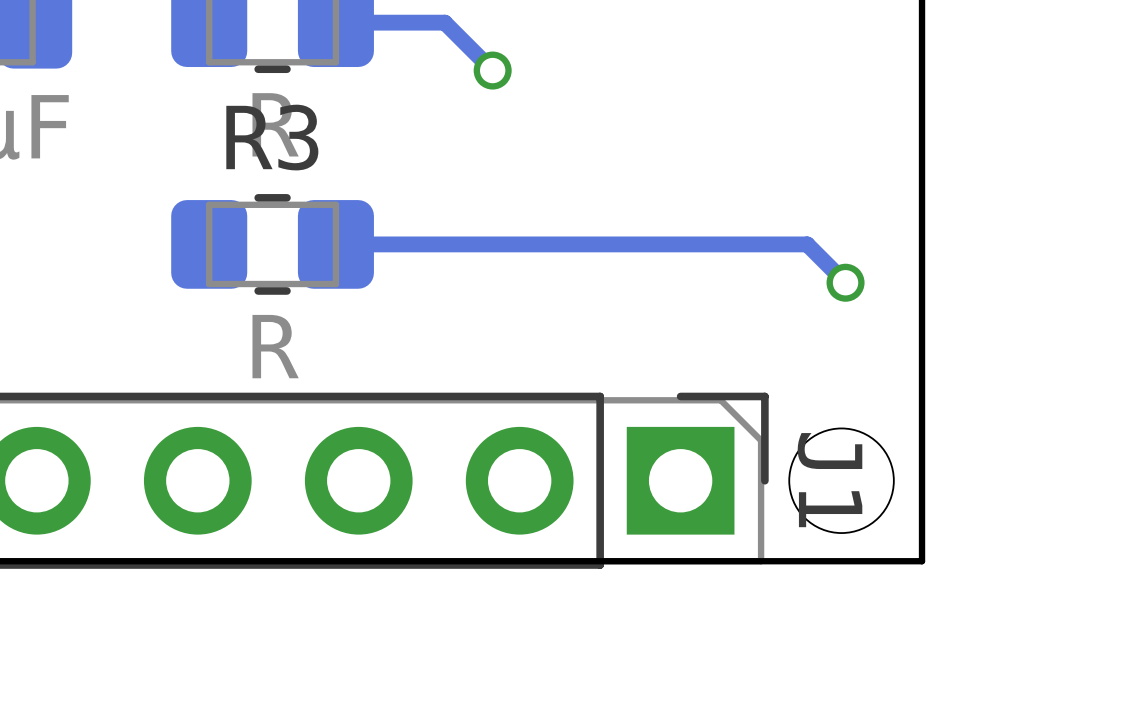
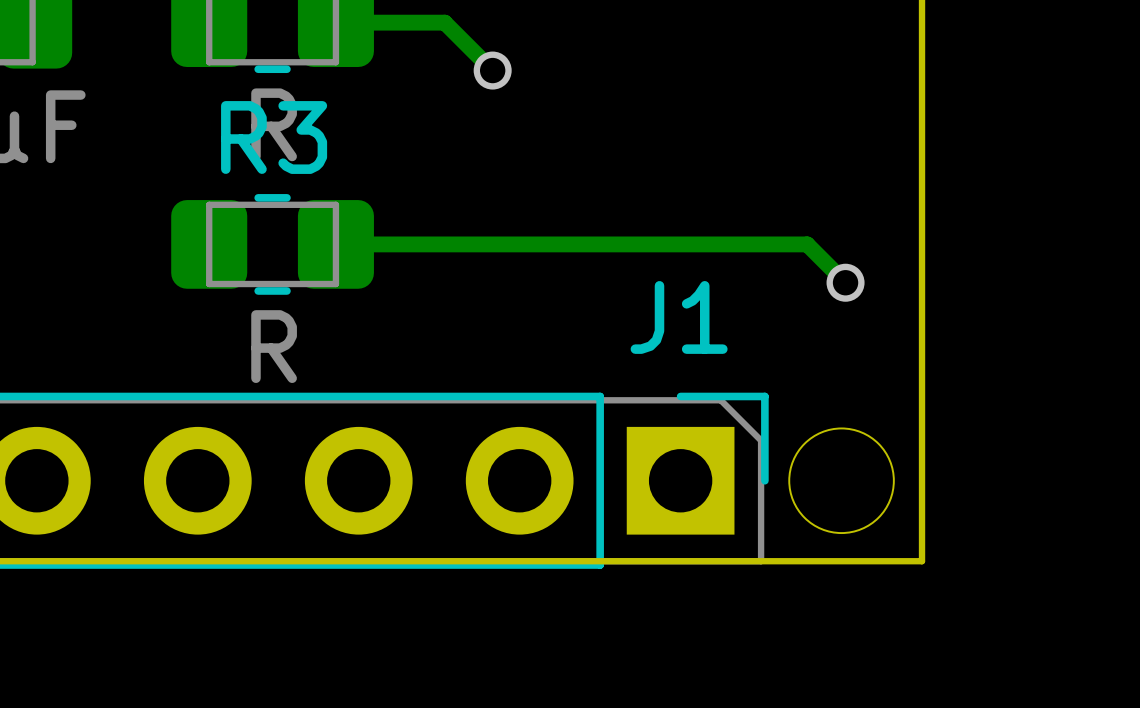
J1 name rotation: 0° (830, 480) -> 90° counterclockwise (679, 317)
J1 name position: J1 (830, 480) -> J1 (679, 317)

